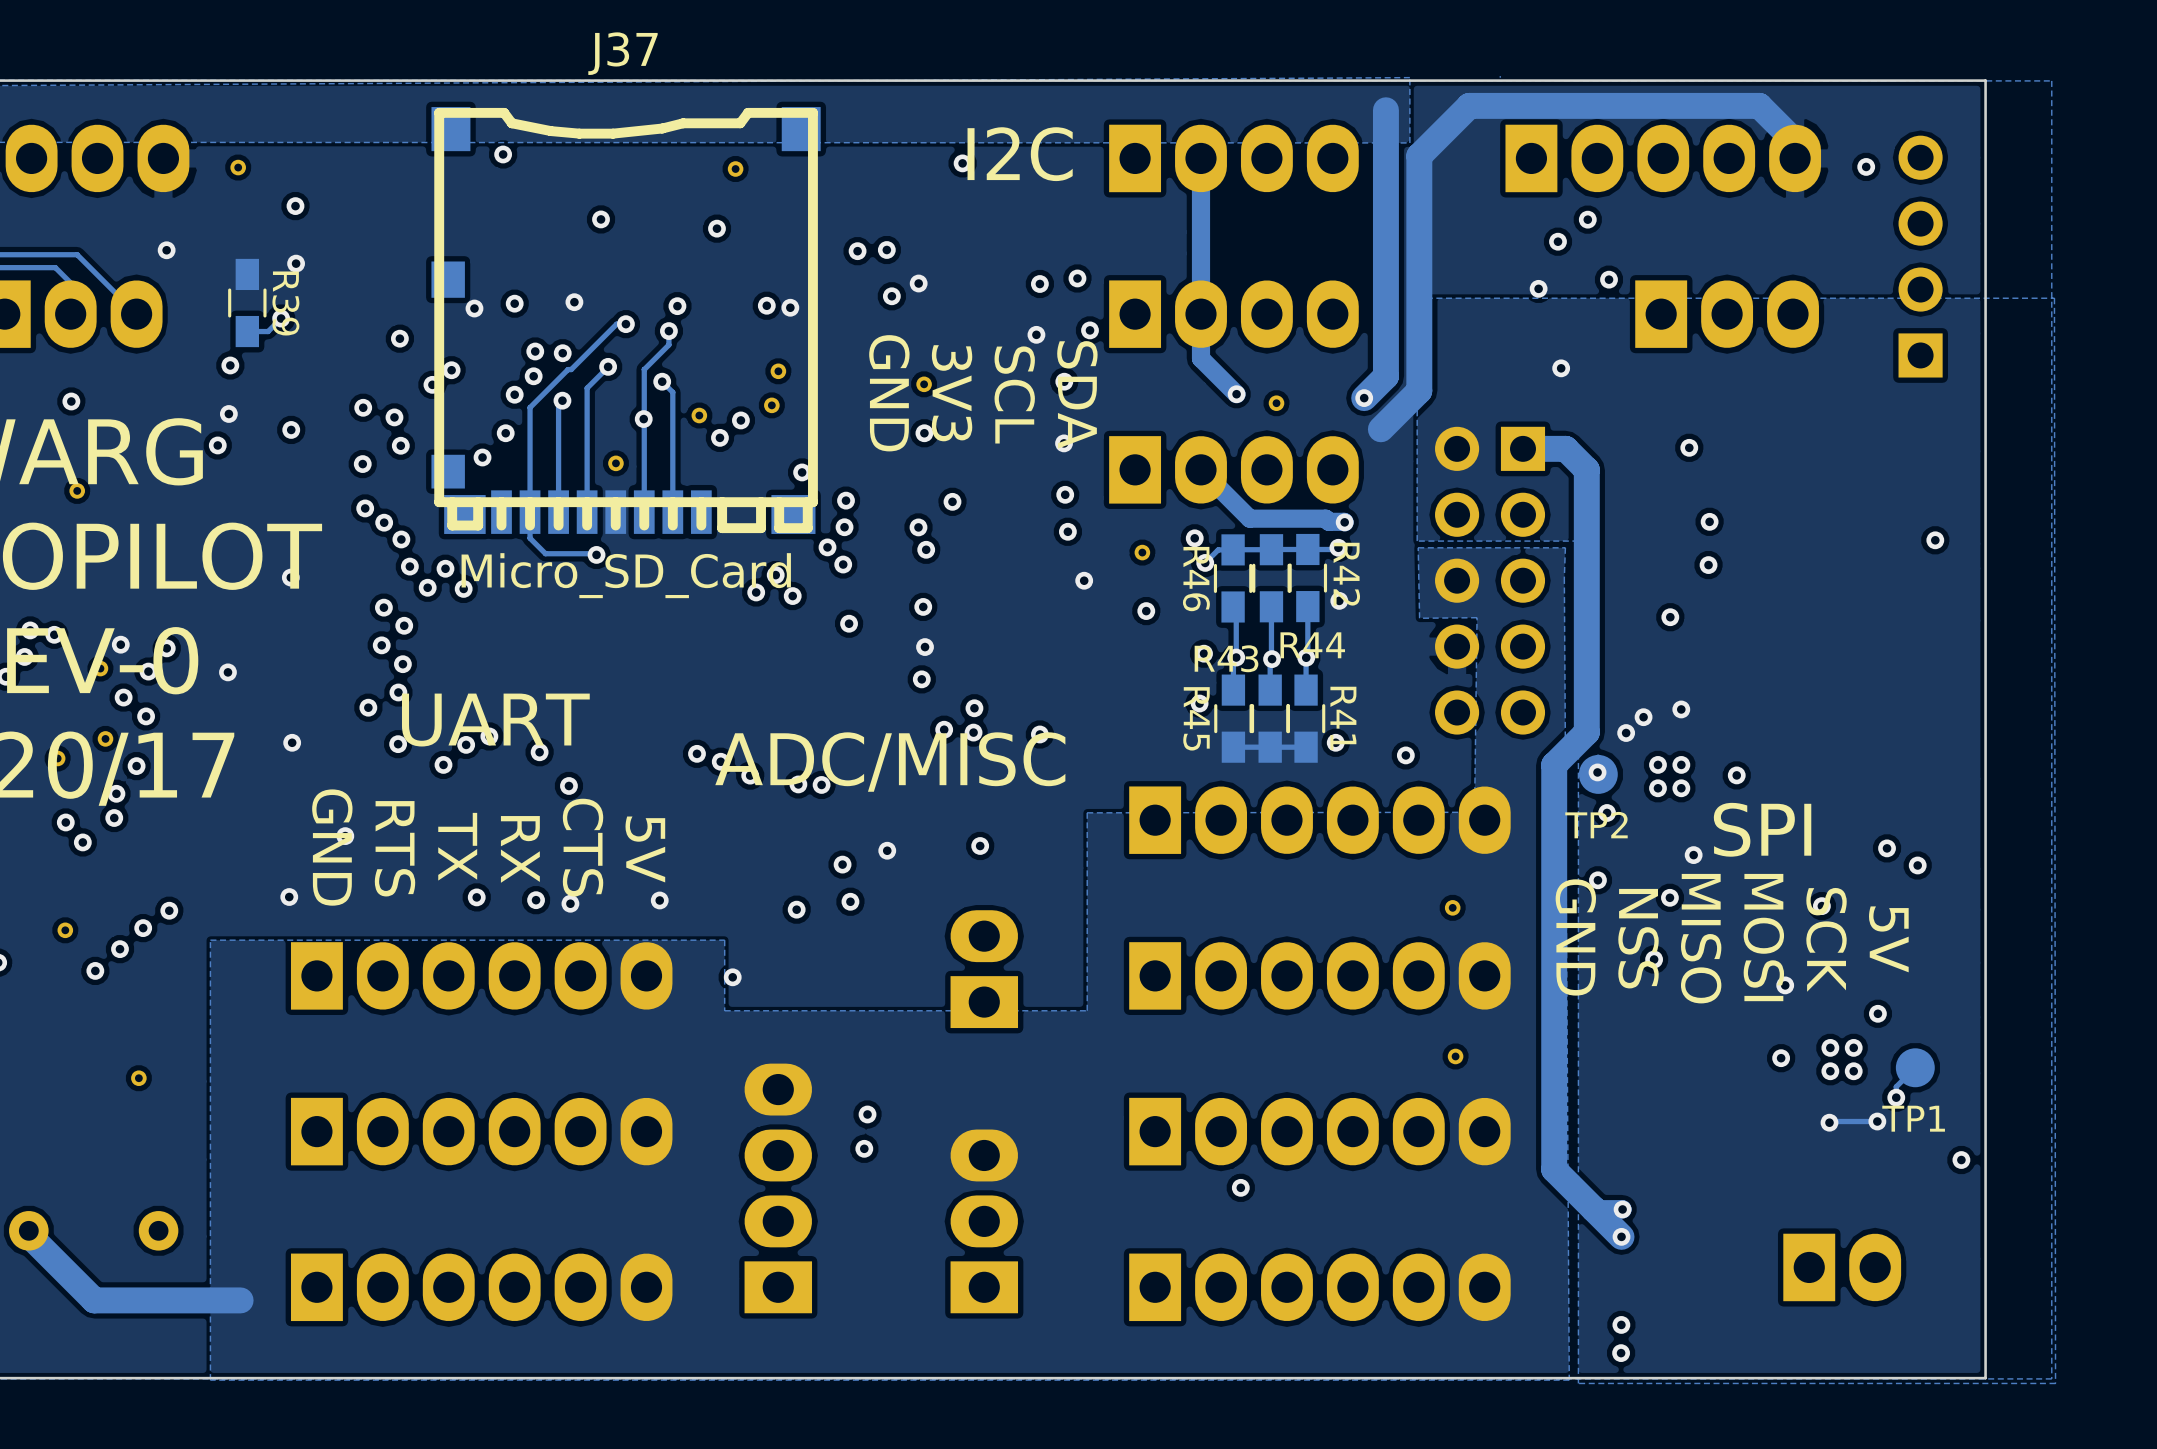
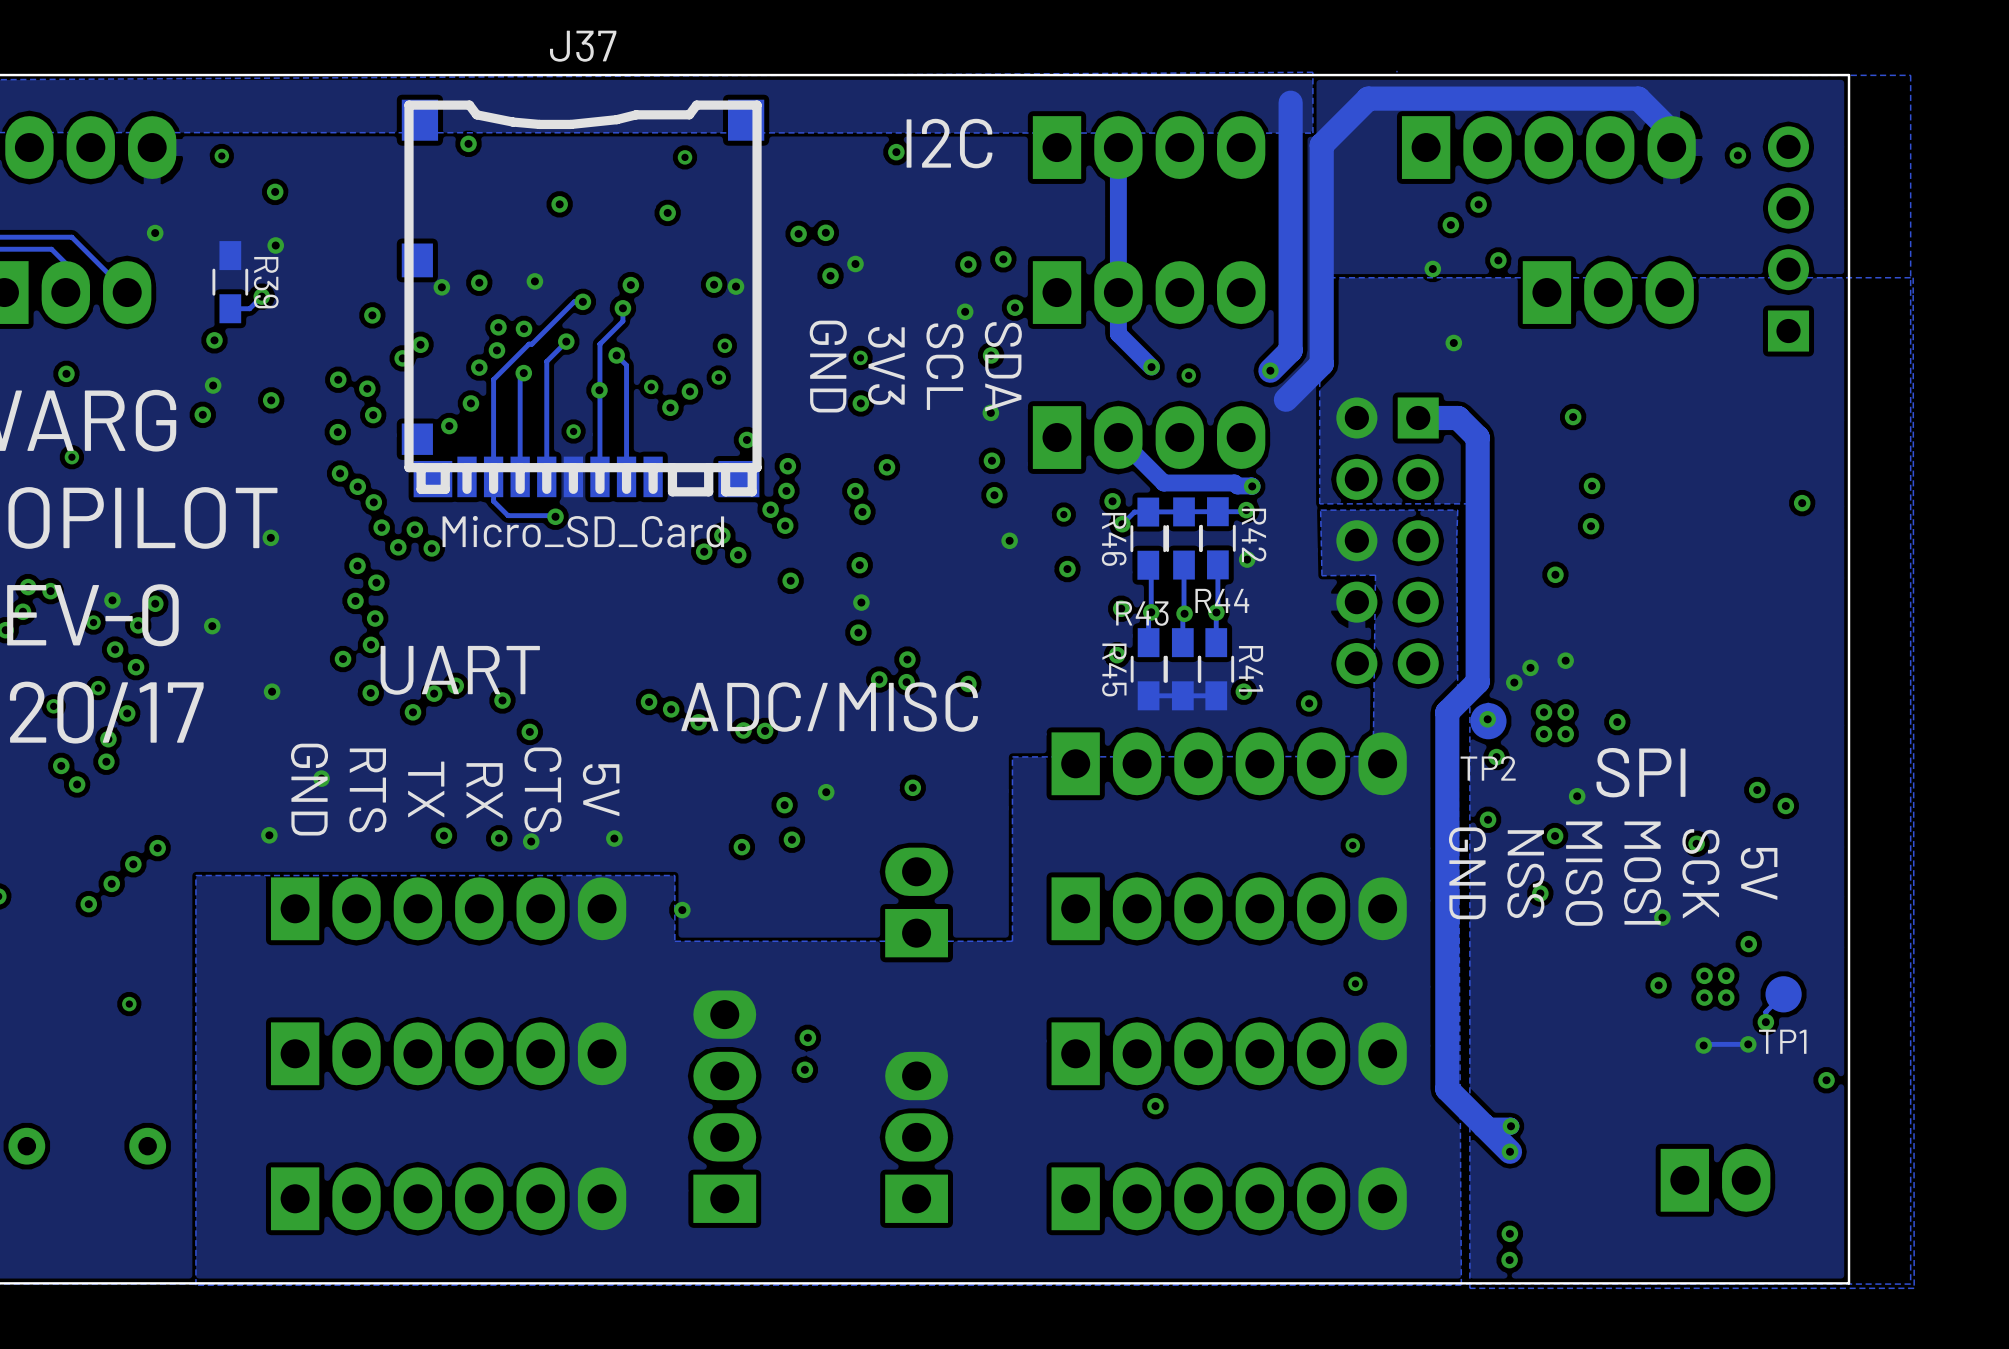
part: (65, 930) -> none
track: (28, 1230) (28, 1234) (94, 1300) (240, 1300) -> none

